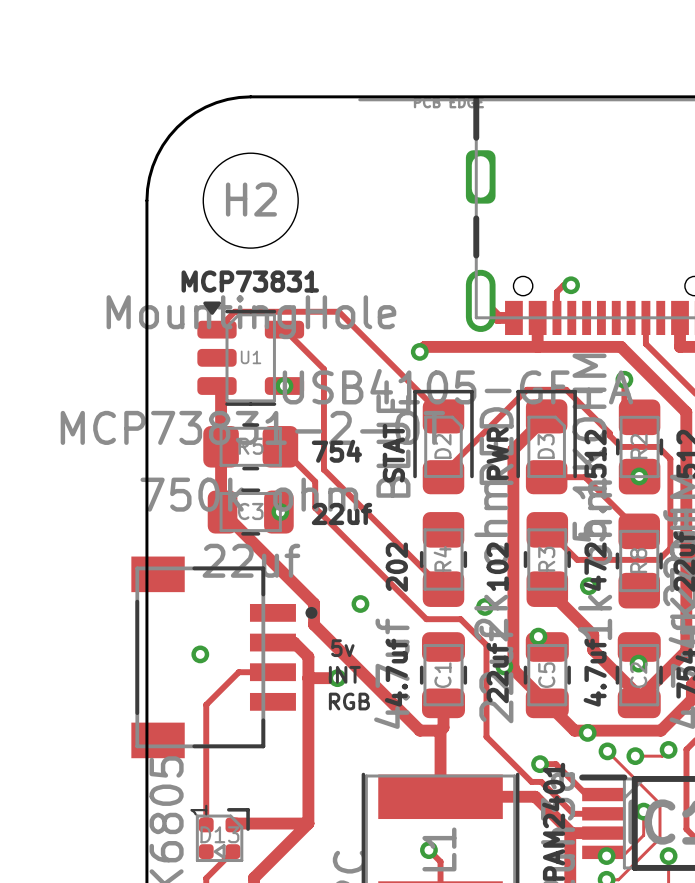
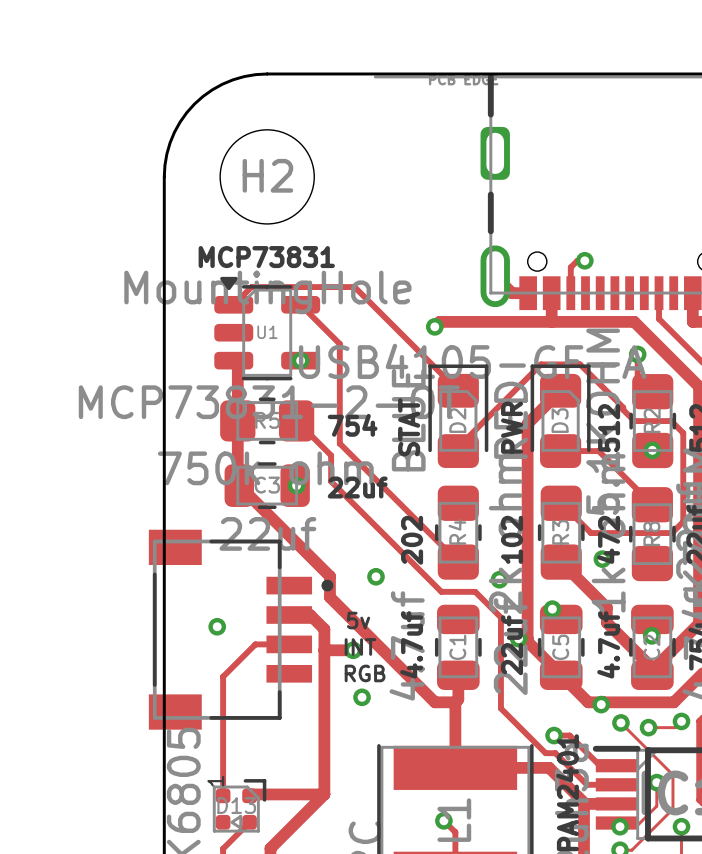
via: none -> (362, 697)

